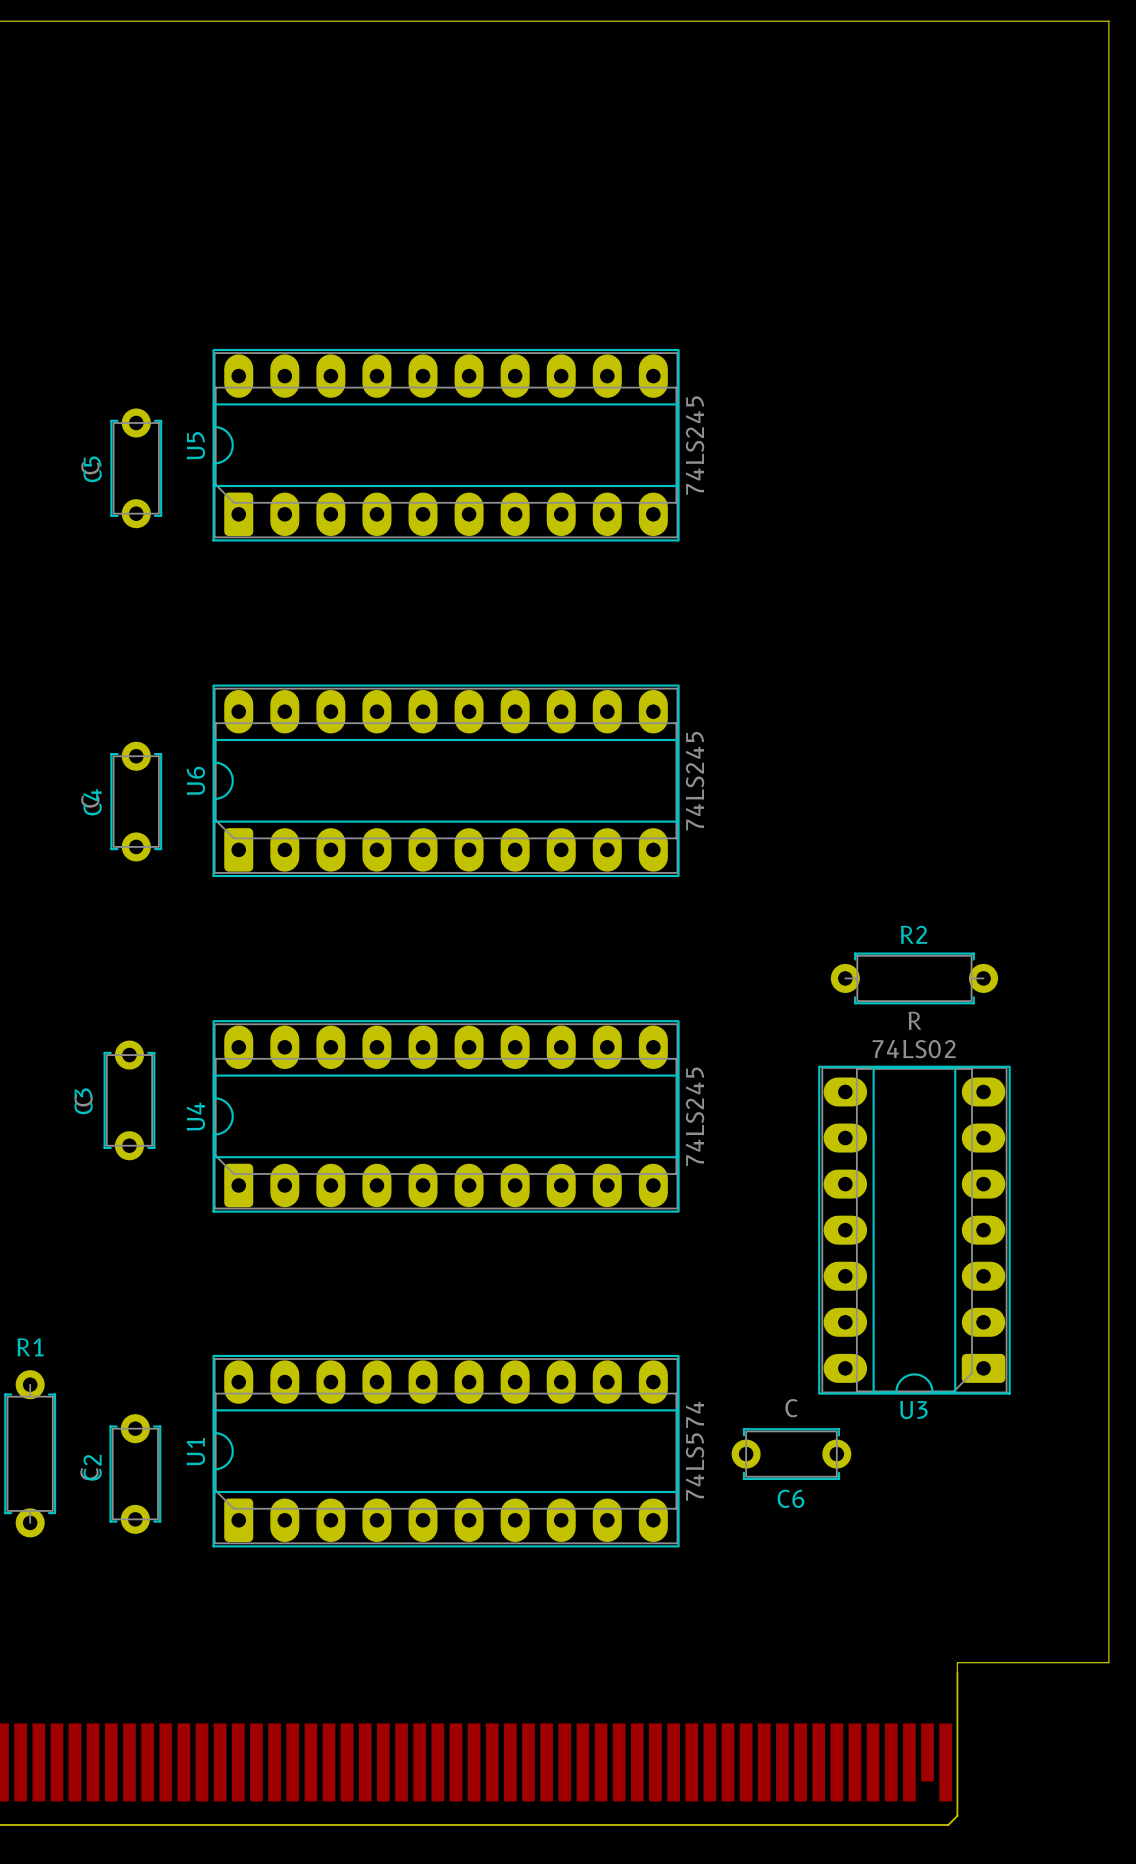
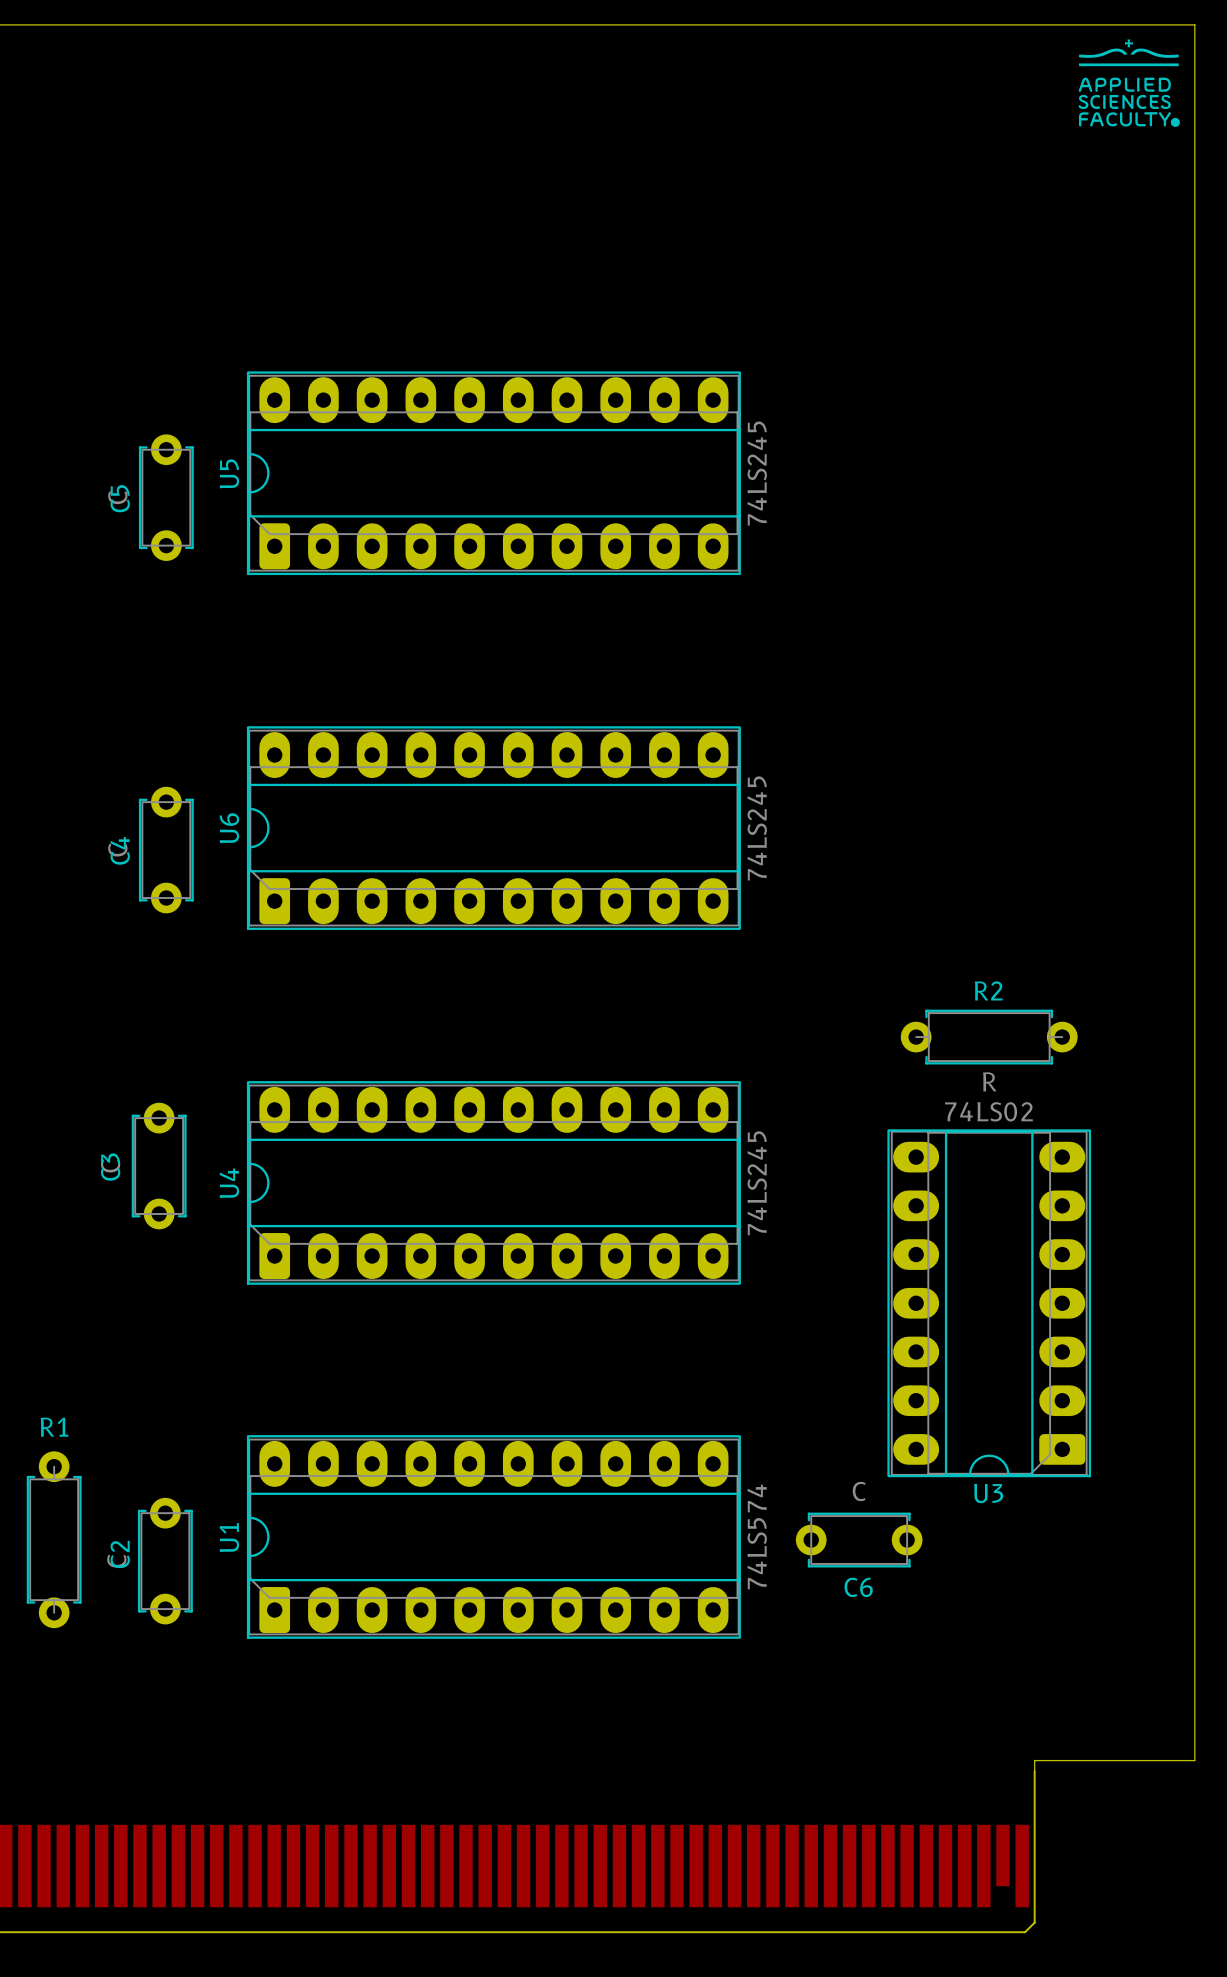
drawing: none -> [1078, 39, 1180, 127]

